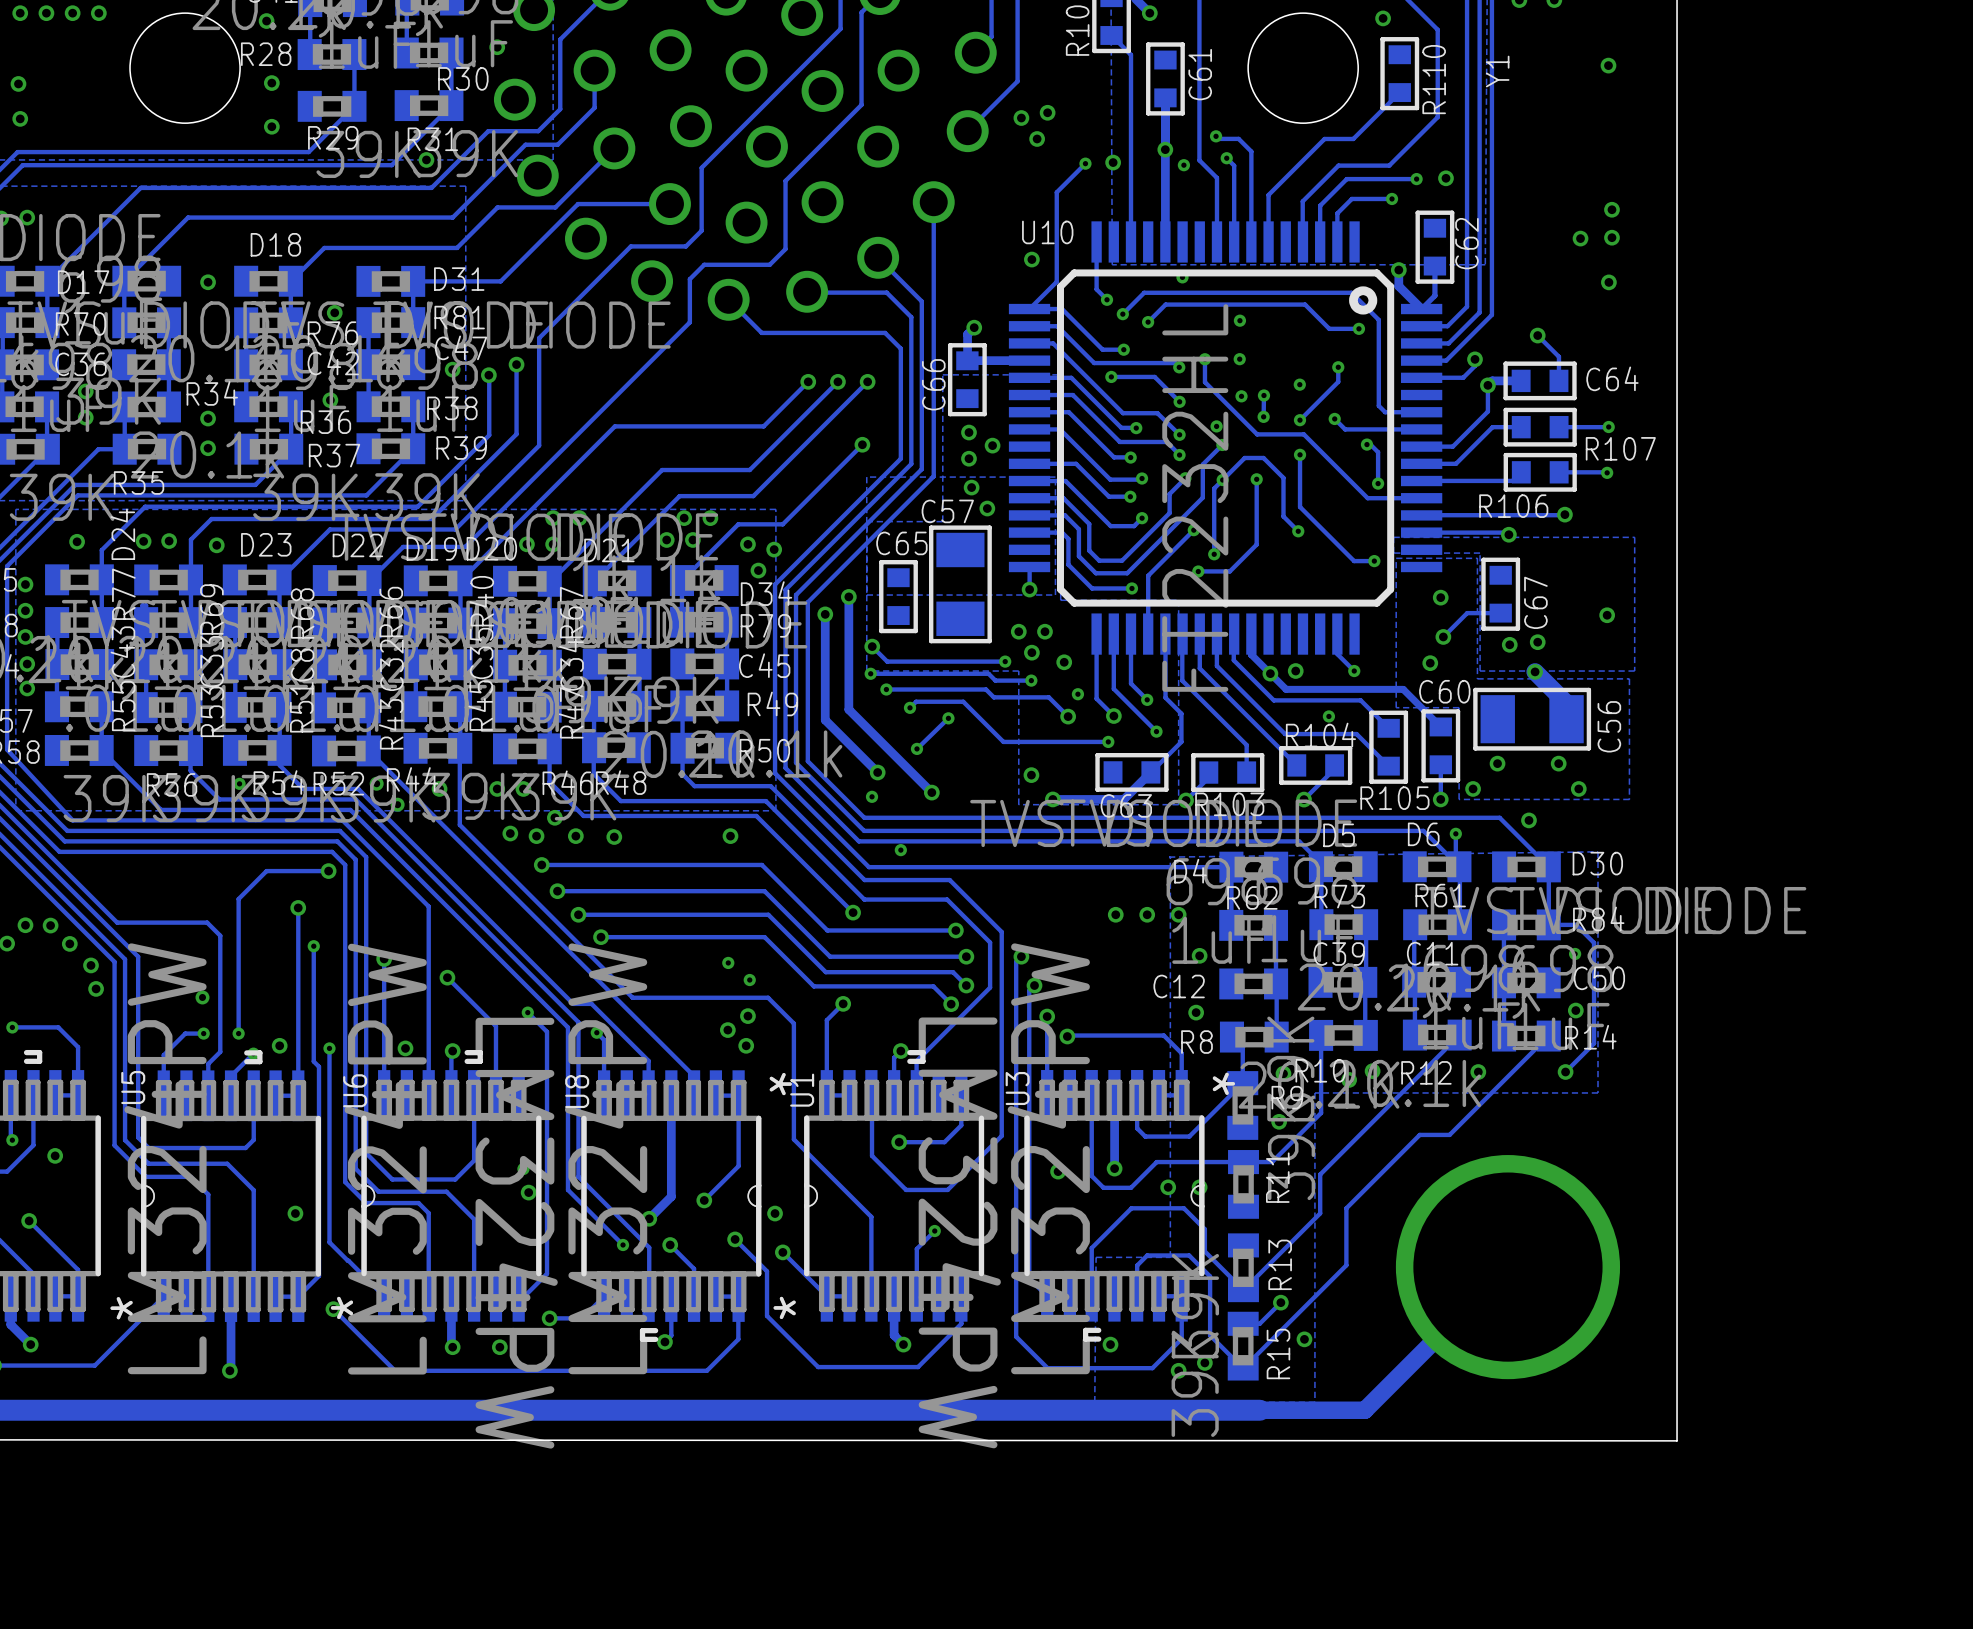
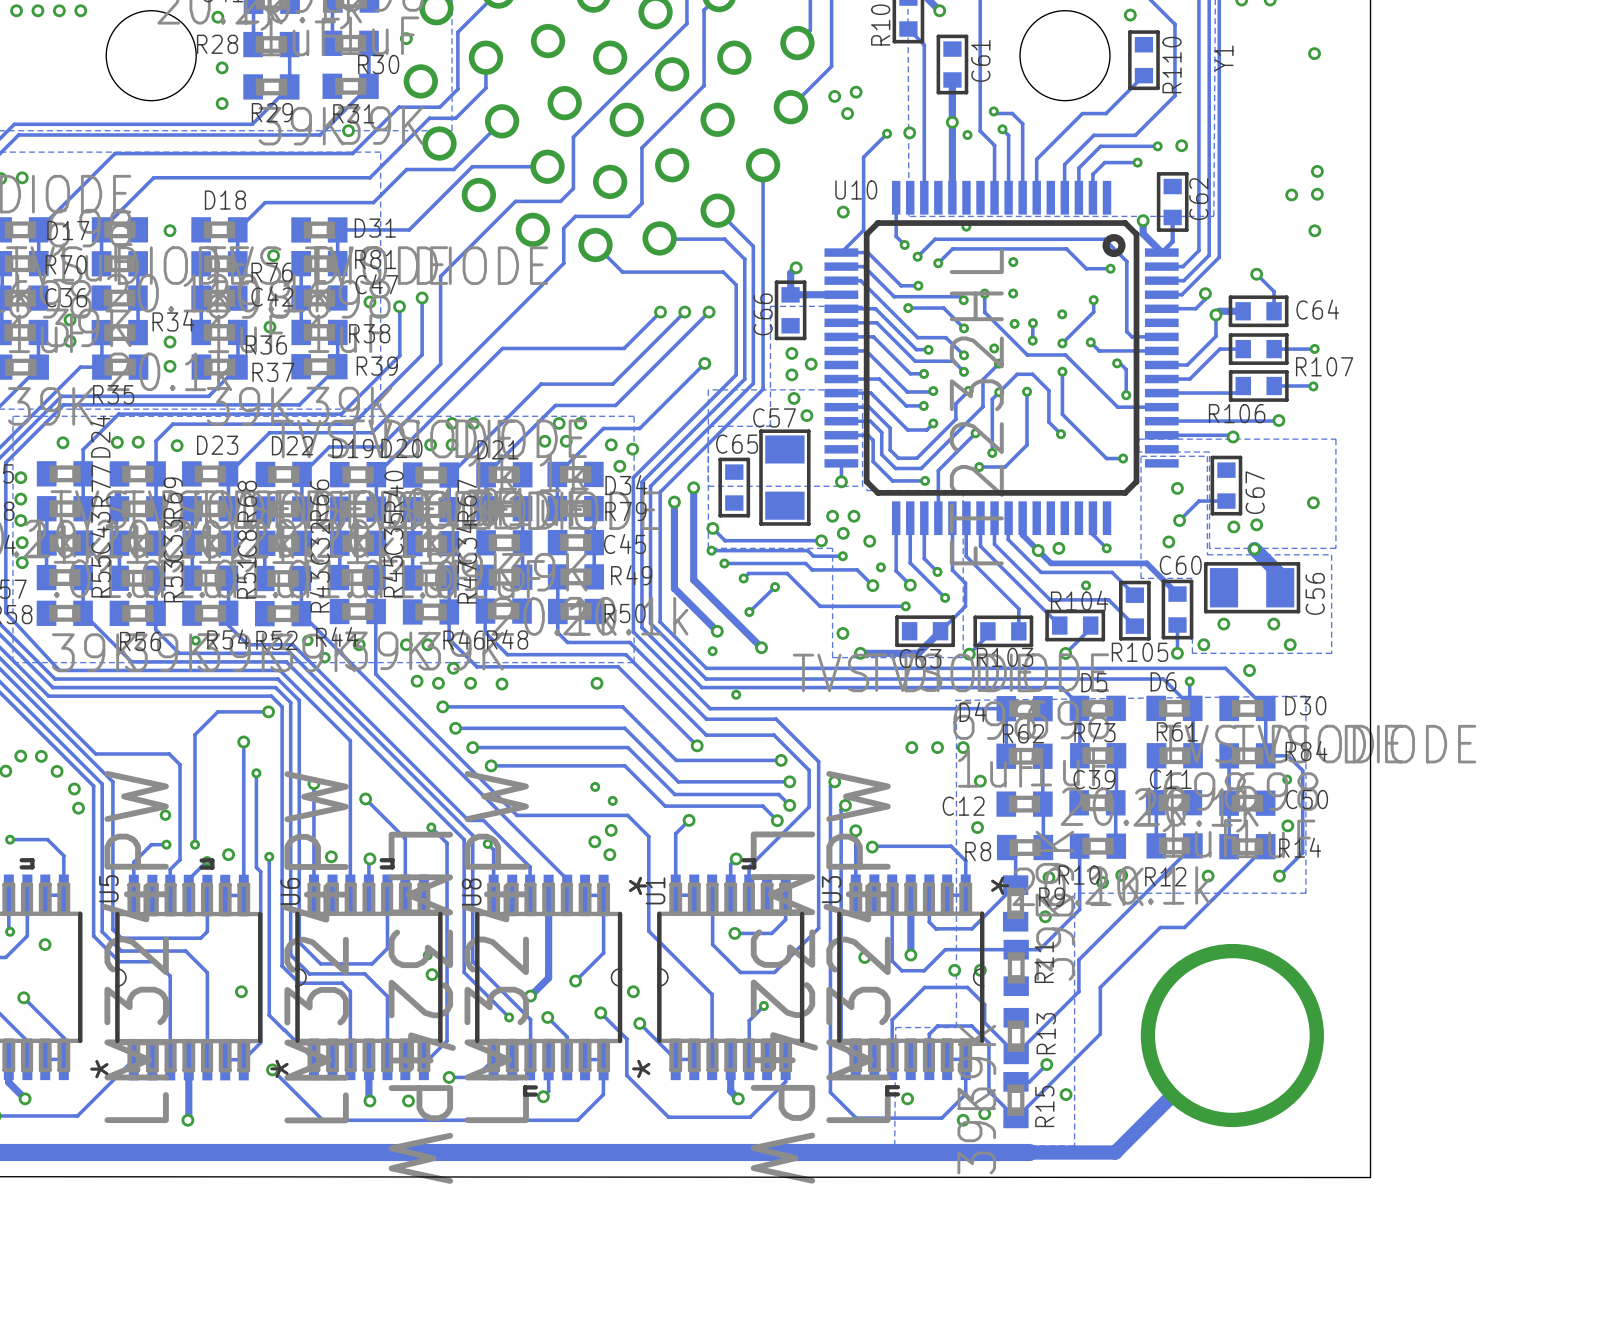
via: (18, 83) -> none
via: (20, 118) -> none
via: none -> (821, 540)

